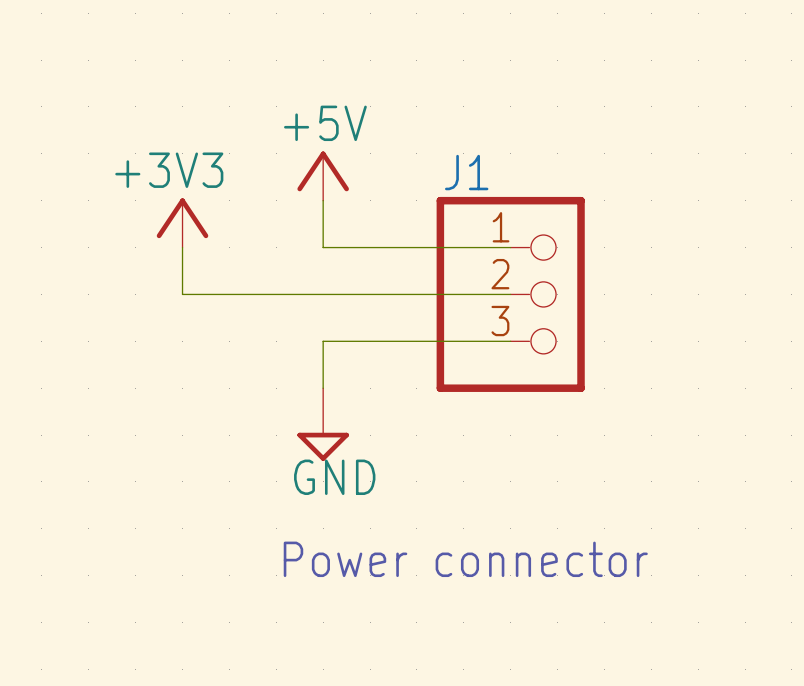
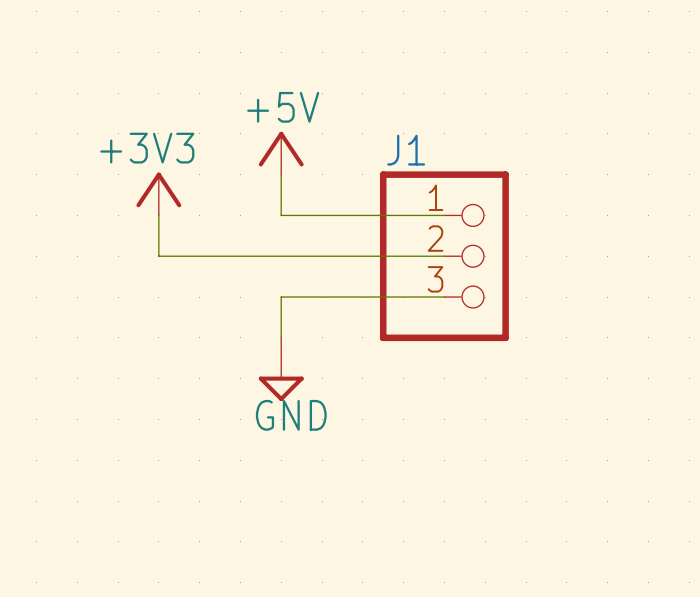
text: Power connector (465, 559) -> none

